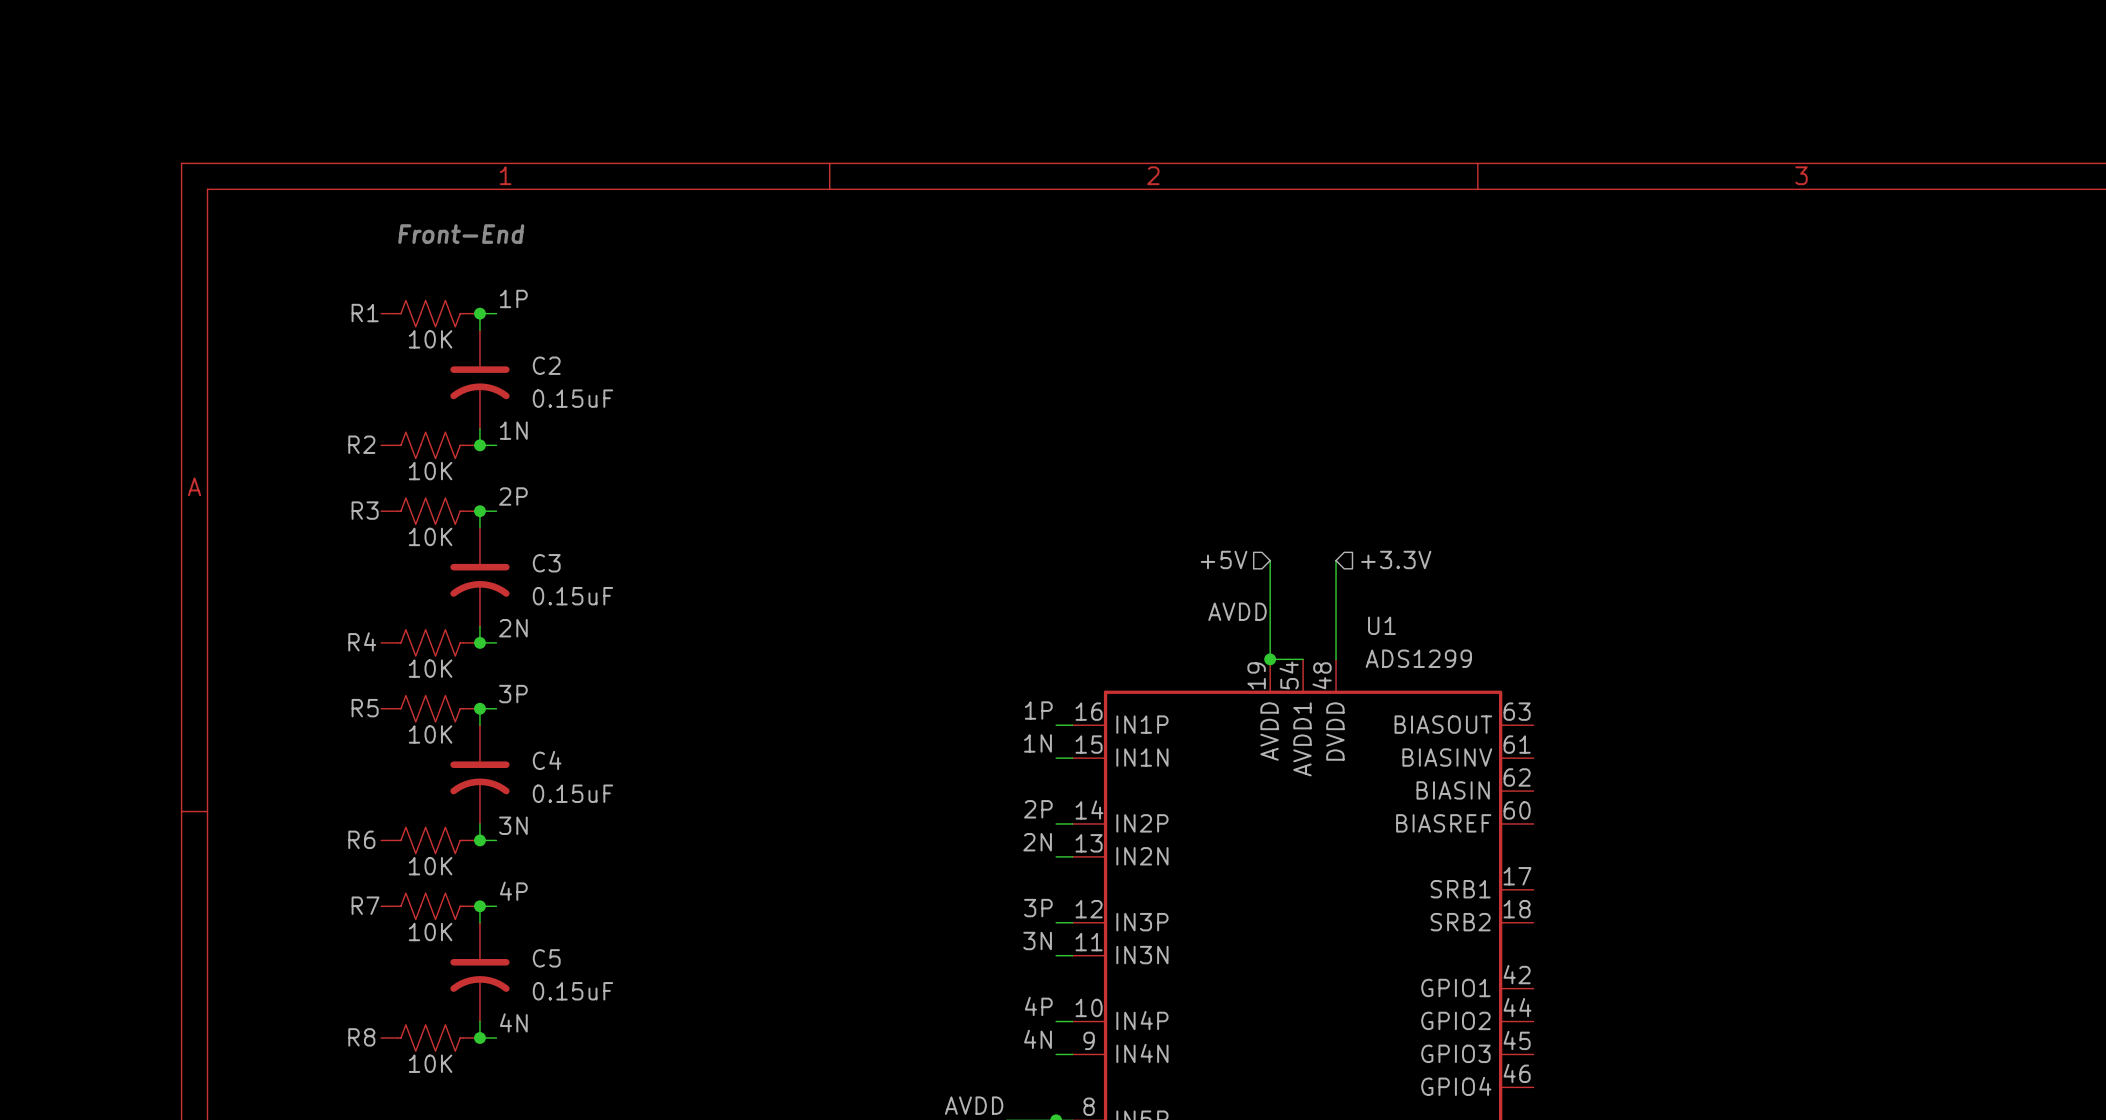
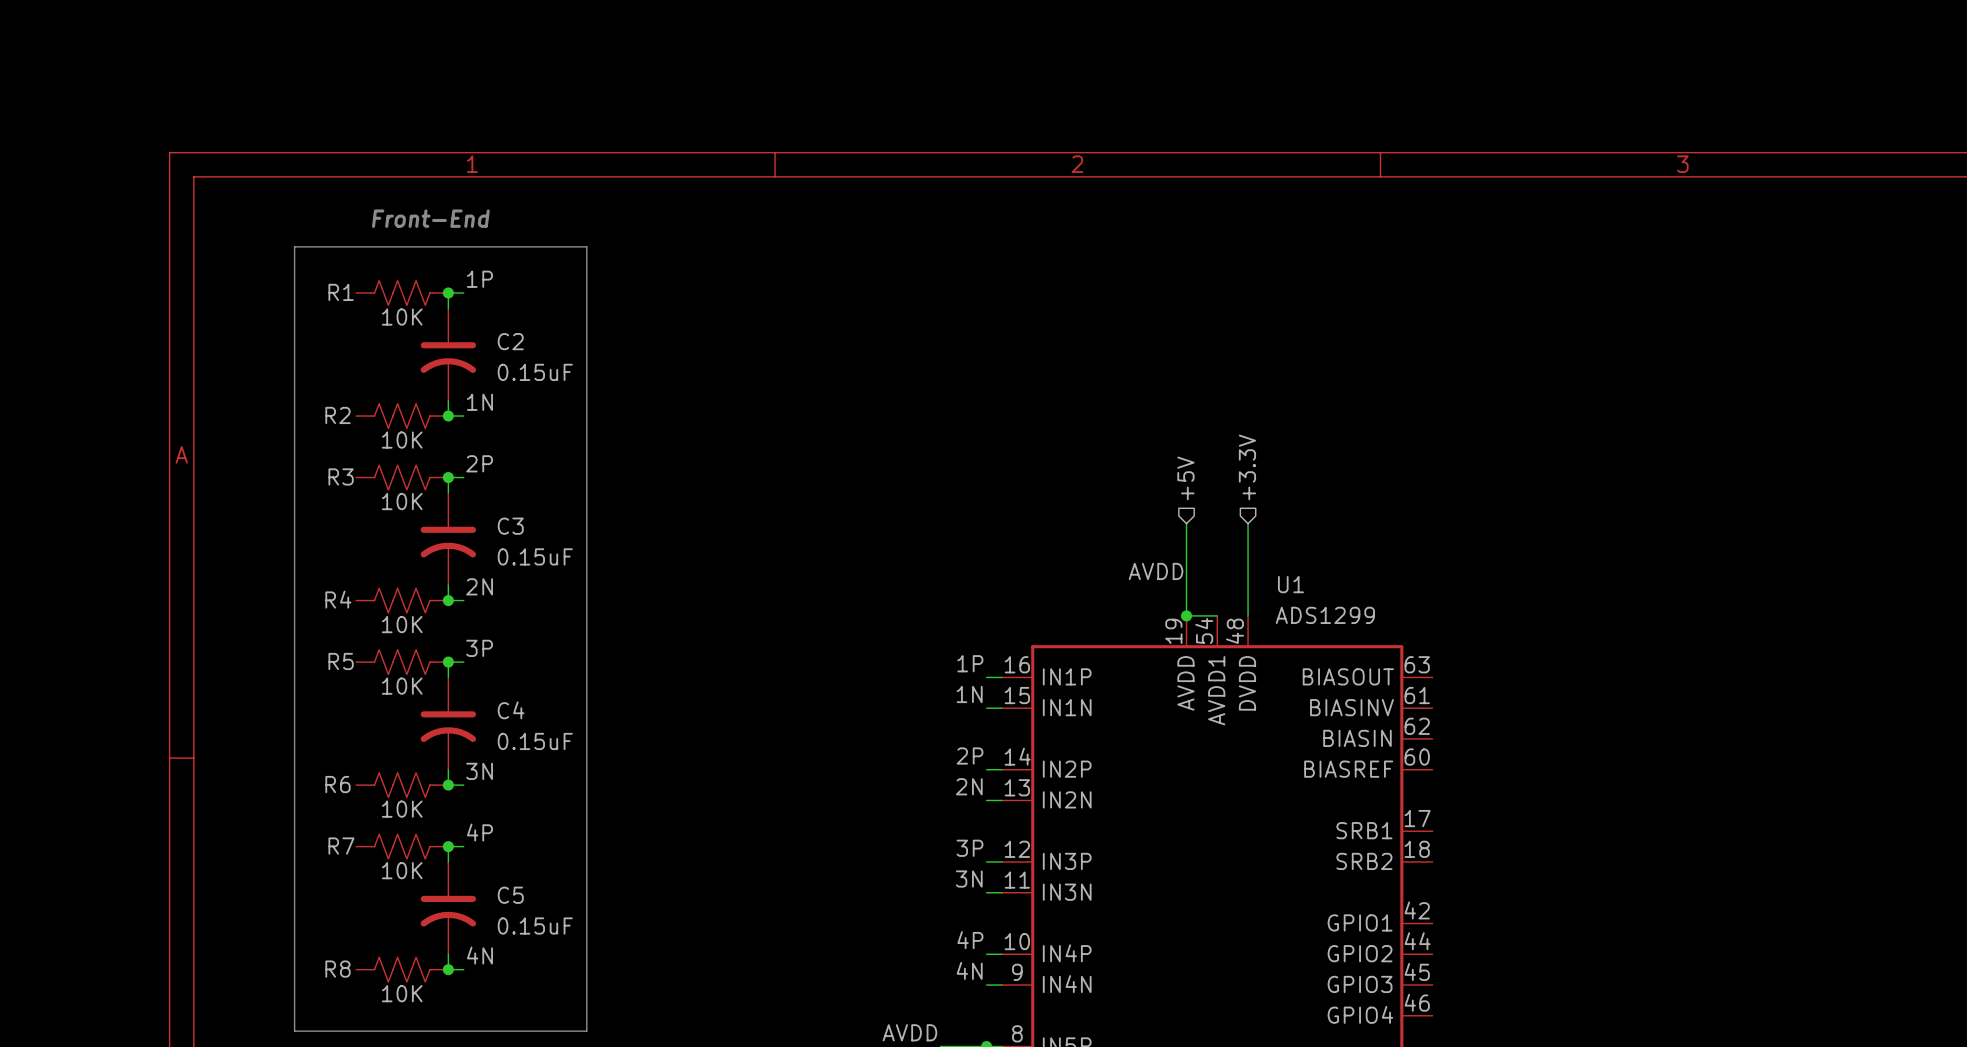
line: none -> (294, 246) (294, 1031) (586, 1031) (586, 246) (294, 246)
hierarchical label rotation: 0° (1224, 559) -> 90° clockwise (1185, 478)
hierarchical label position: +5V (1224, 559) -> +5V (1185, 478)
hierarchical label rotation: 0° (1396, 559) -> 90° counterclockwise (1247, 467)
hierarchical label position: +3.3V (1396, 559) -> +3.3V (1247, 467)

